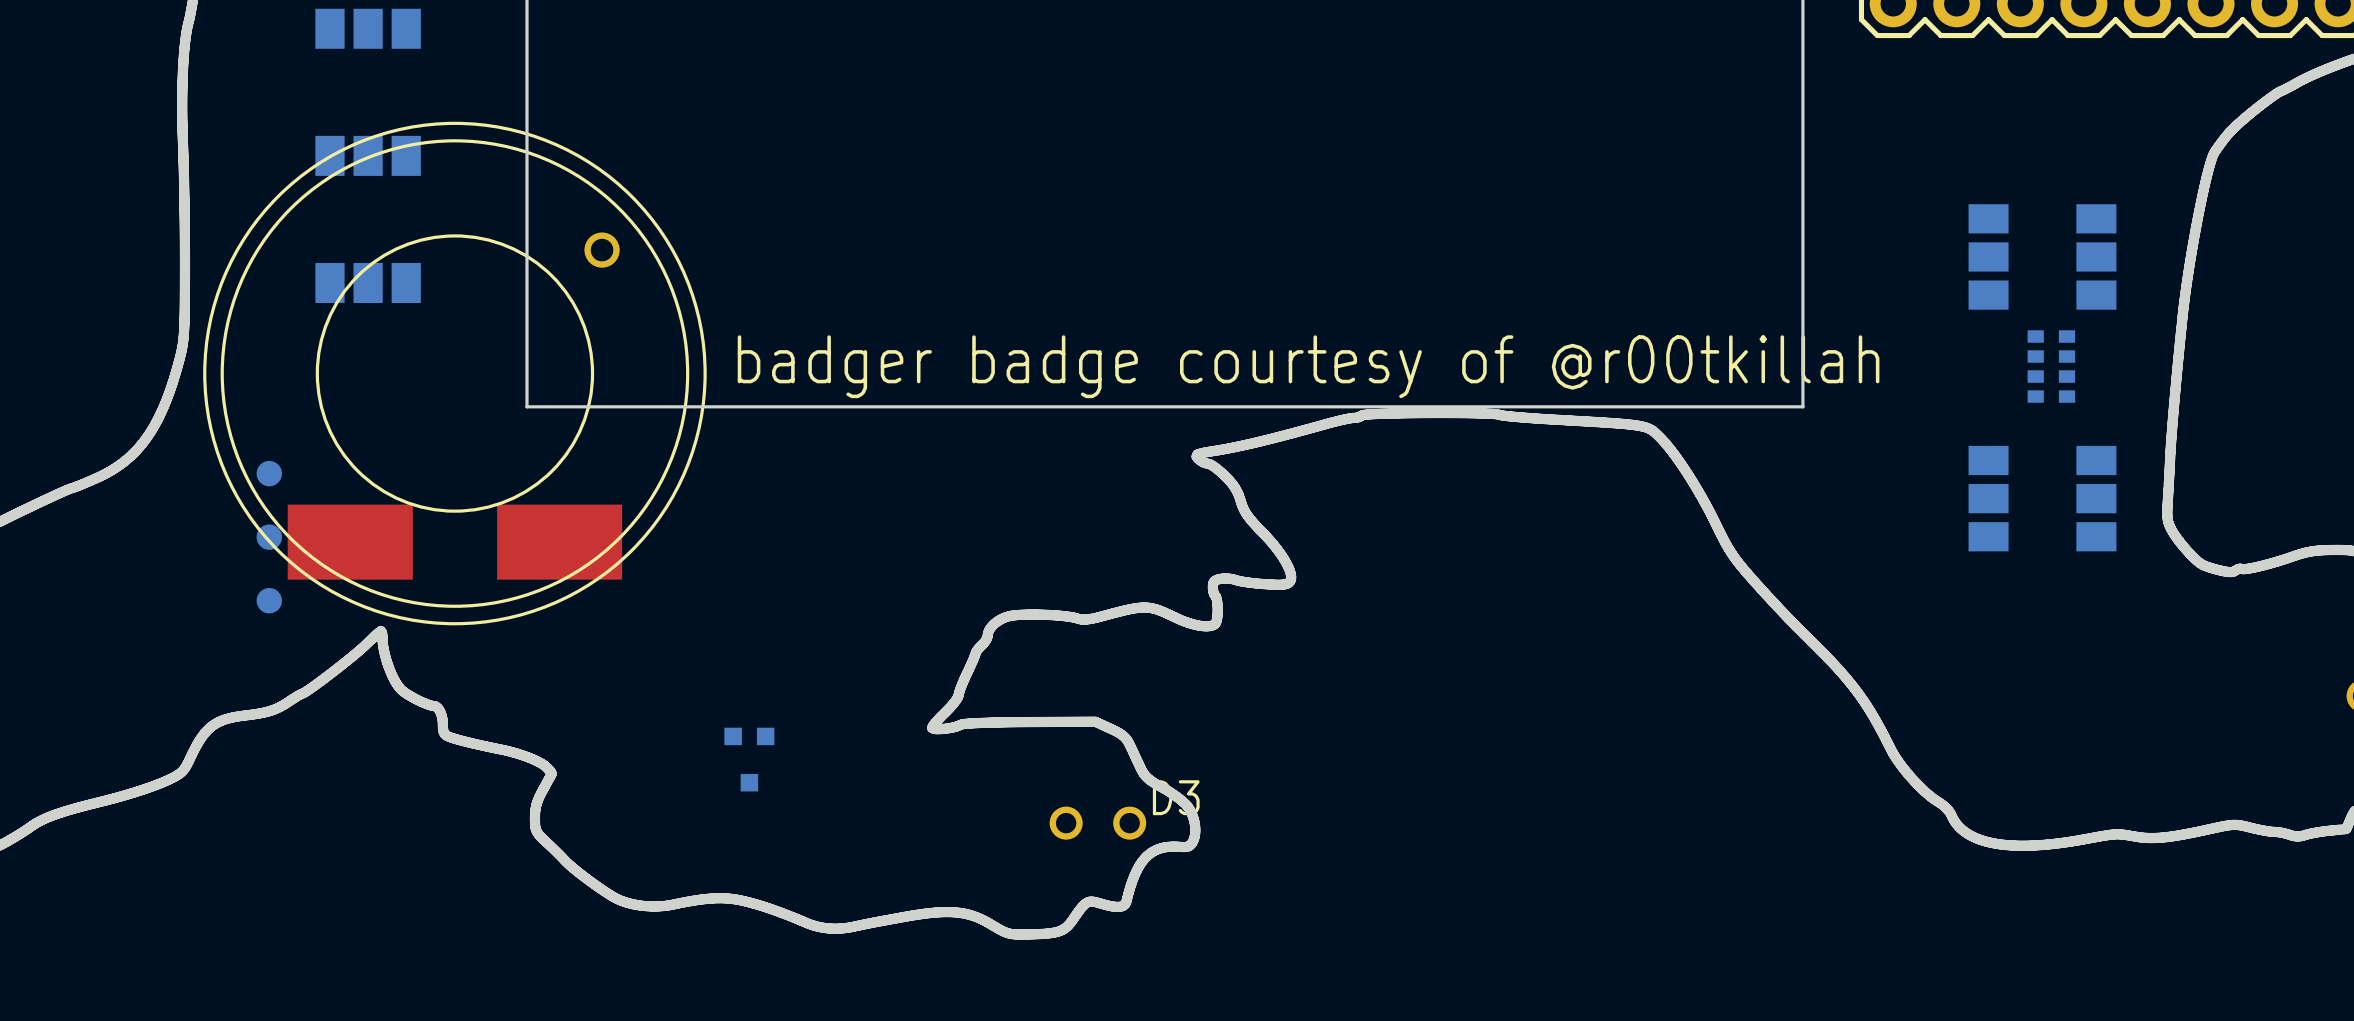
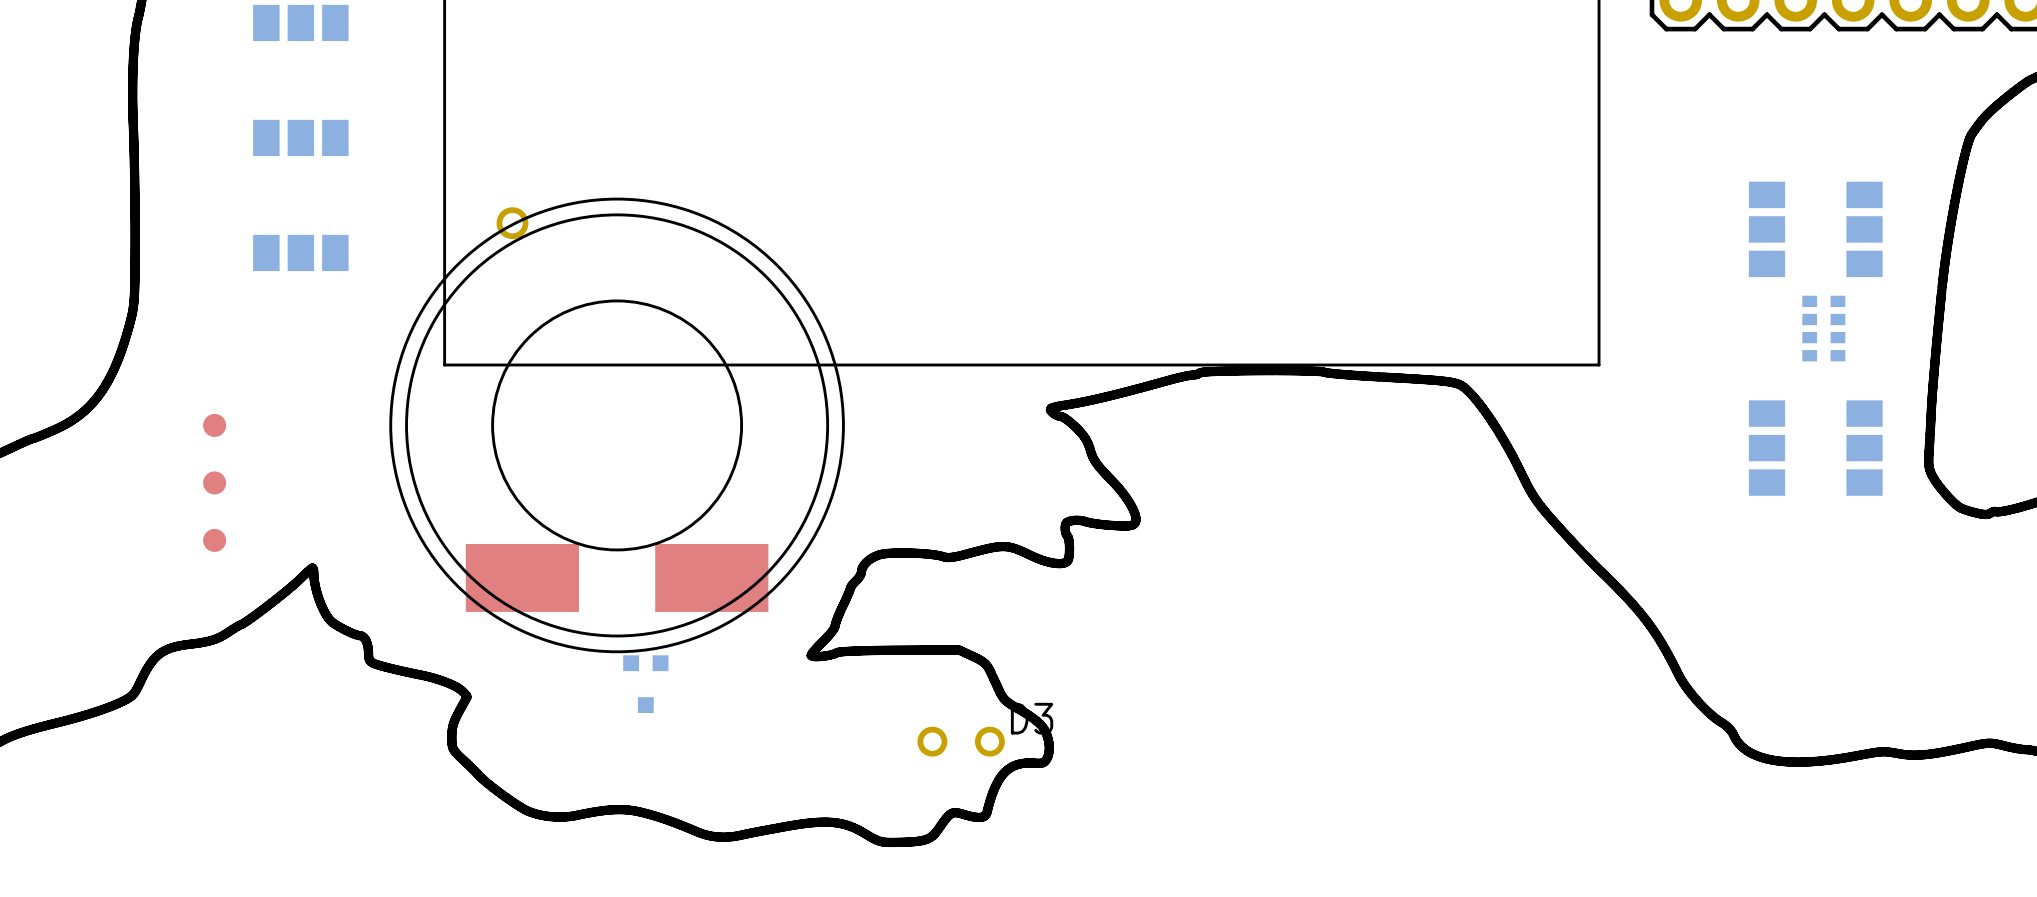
text: badger badge courtesy of @r00tkillah (1308, 366) -> none
part position: (454, 373) -> (617, 425)
part side: bottom (269, 473) -> top (214, 425)
part side: bottom (269, 537) -> top (214, 482)
part side: bottom (269, 600) -> top (214, 540)

